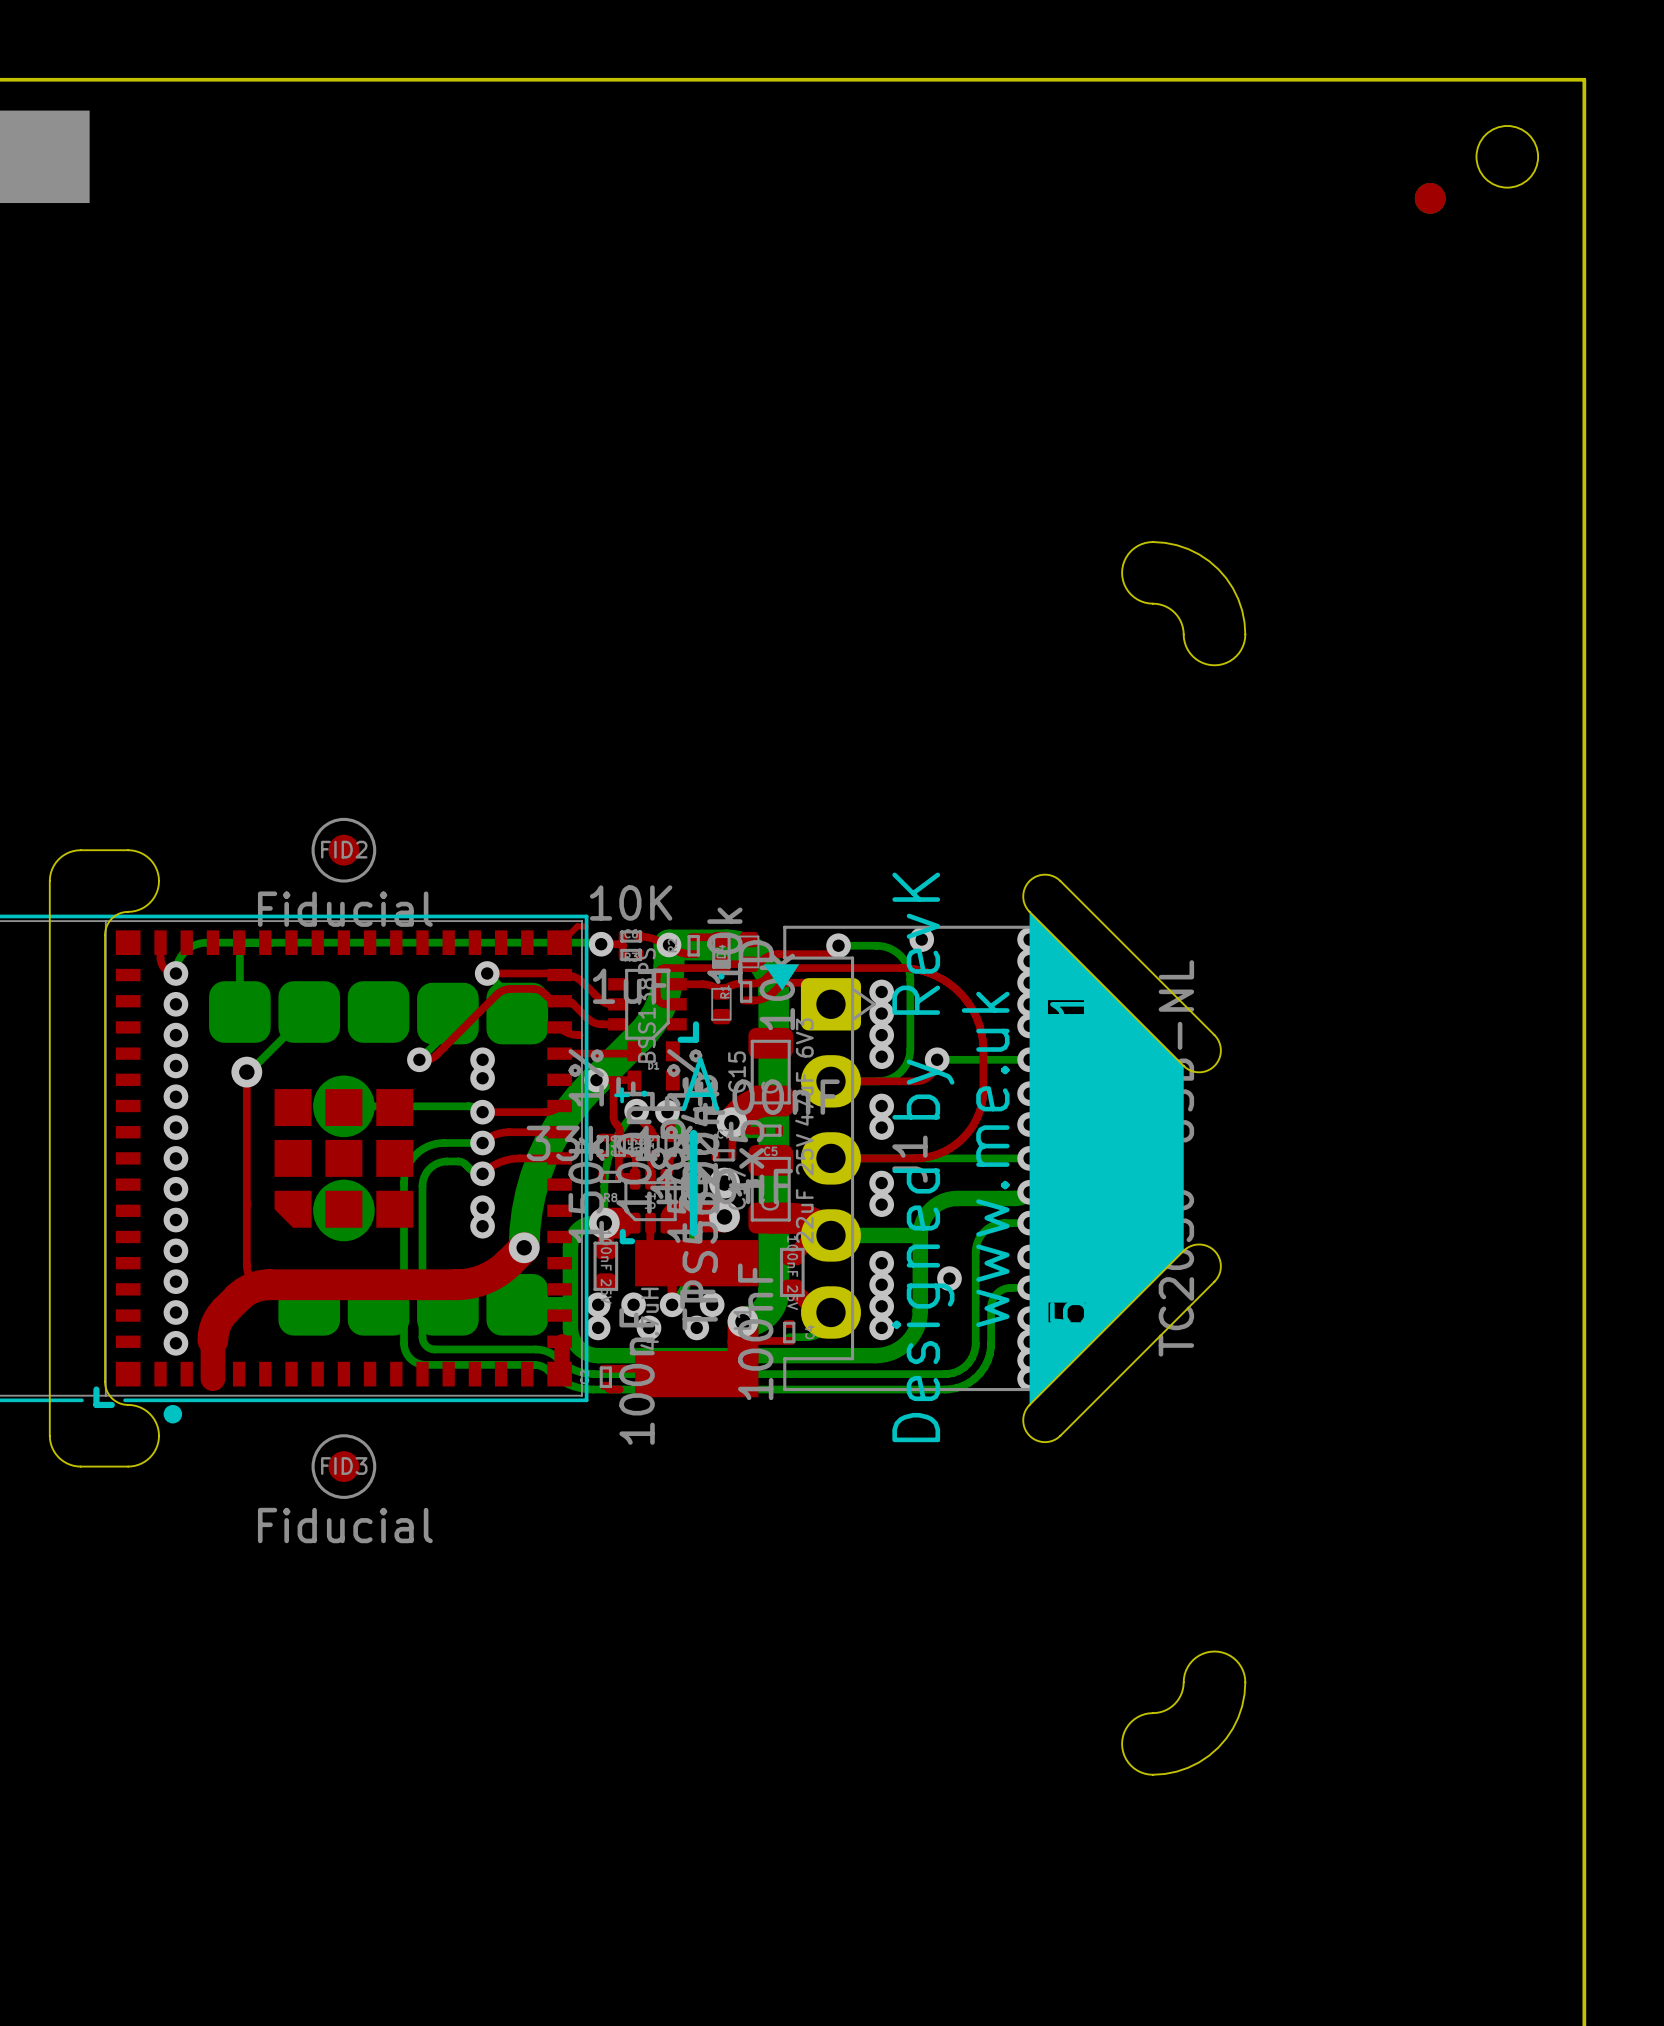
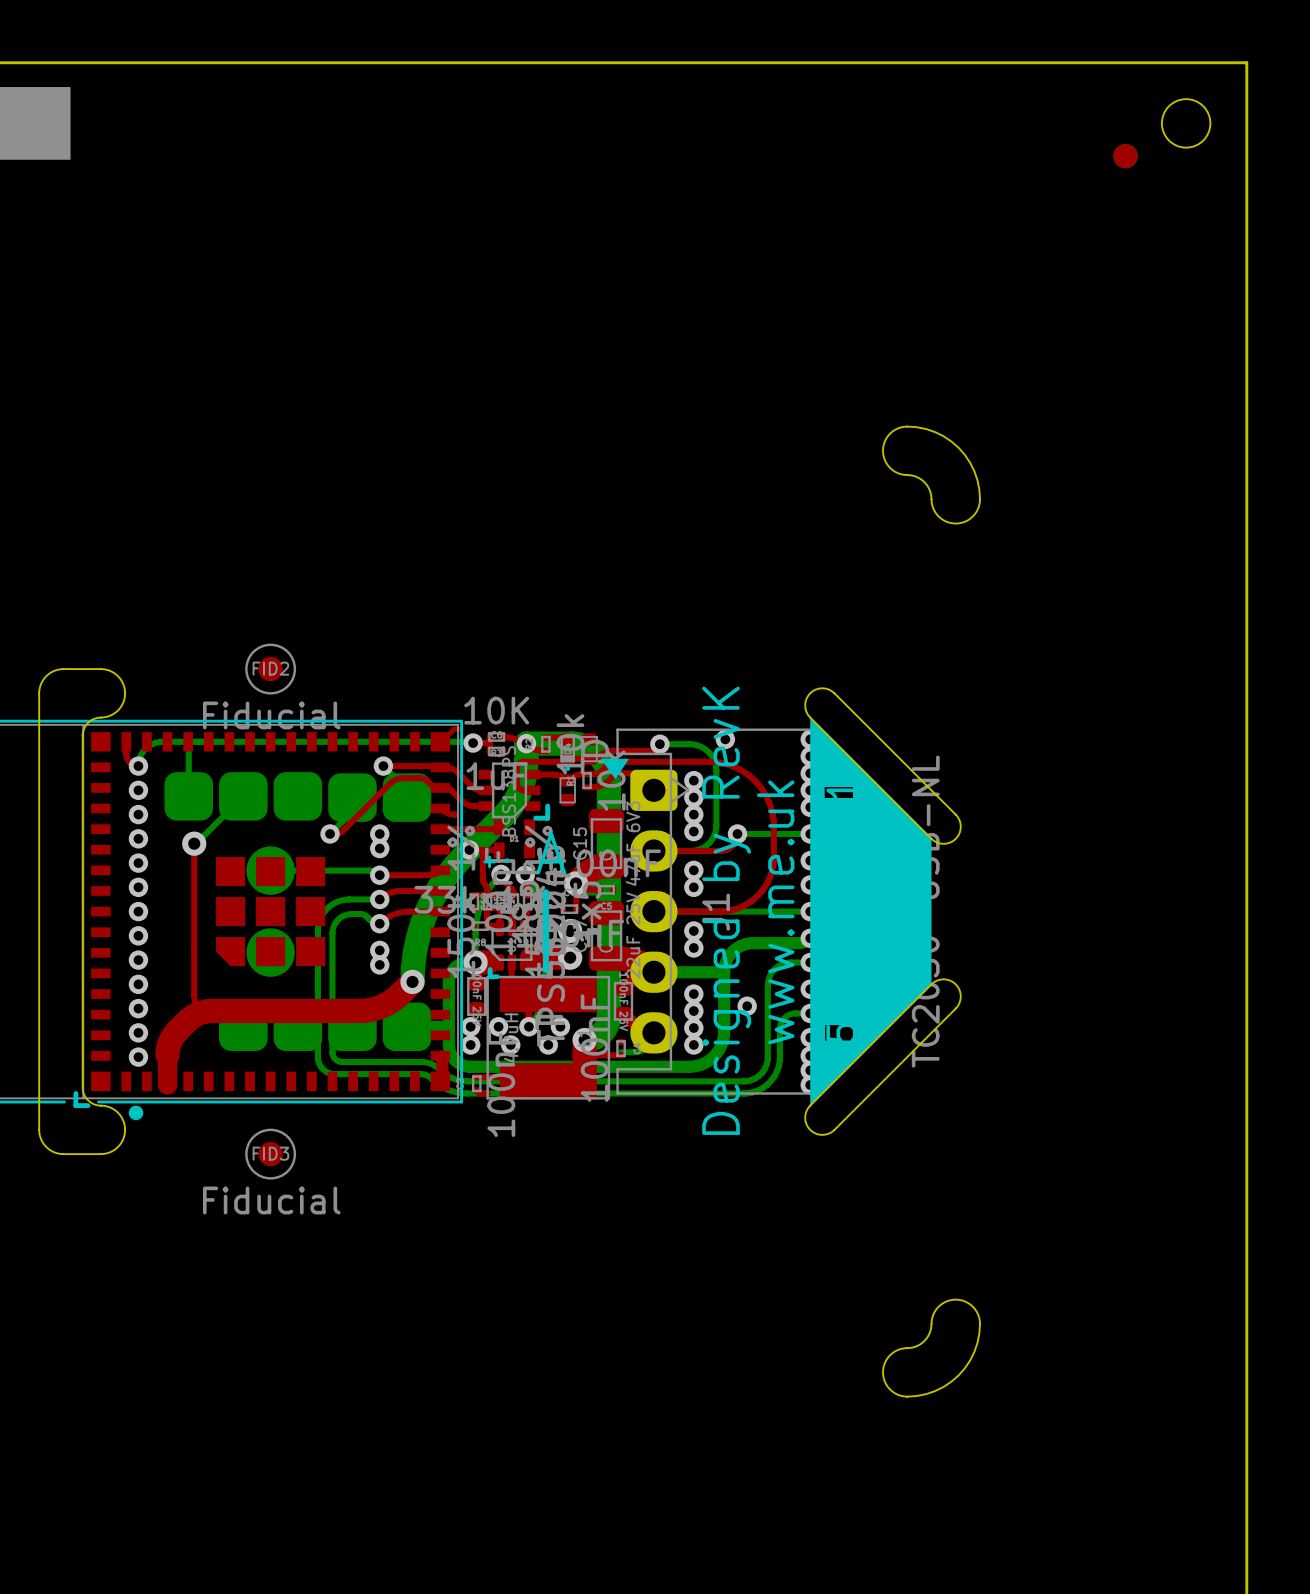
part footprint: [635, 1240, 759, 1398] -> [486, 975, 611, 1100]

